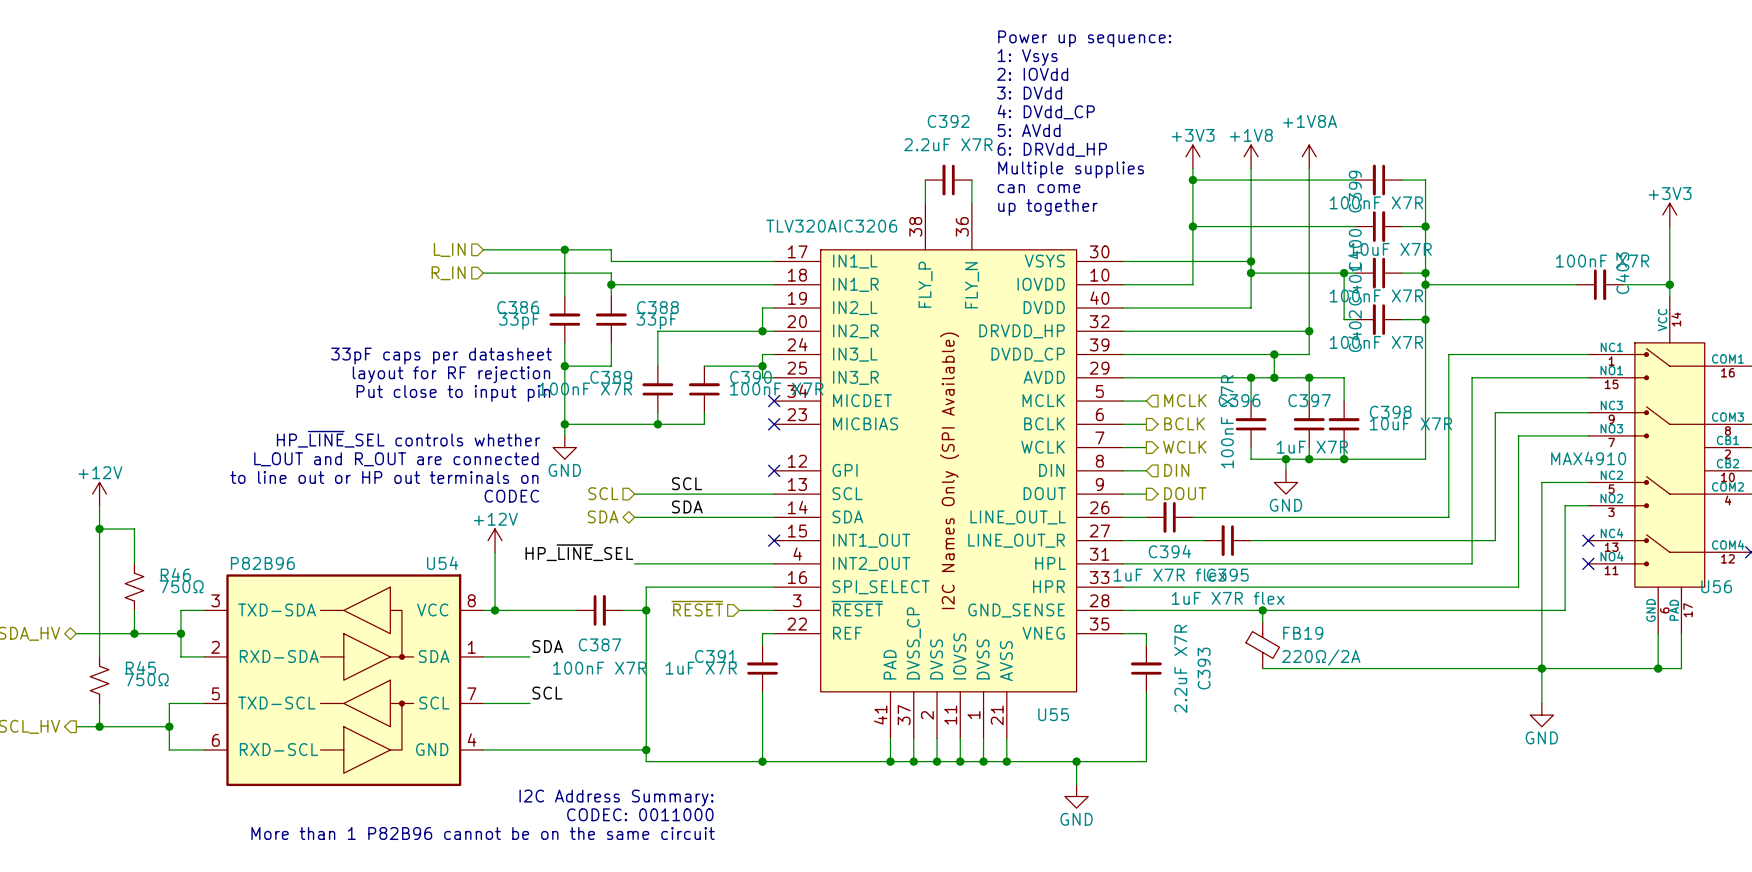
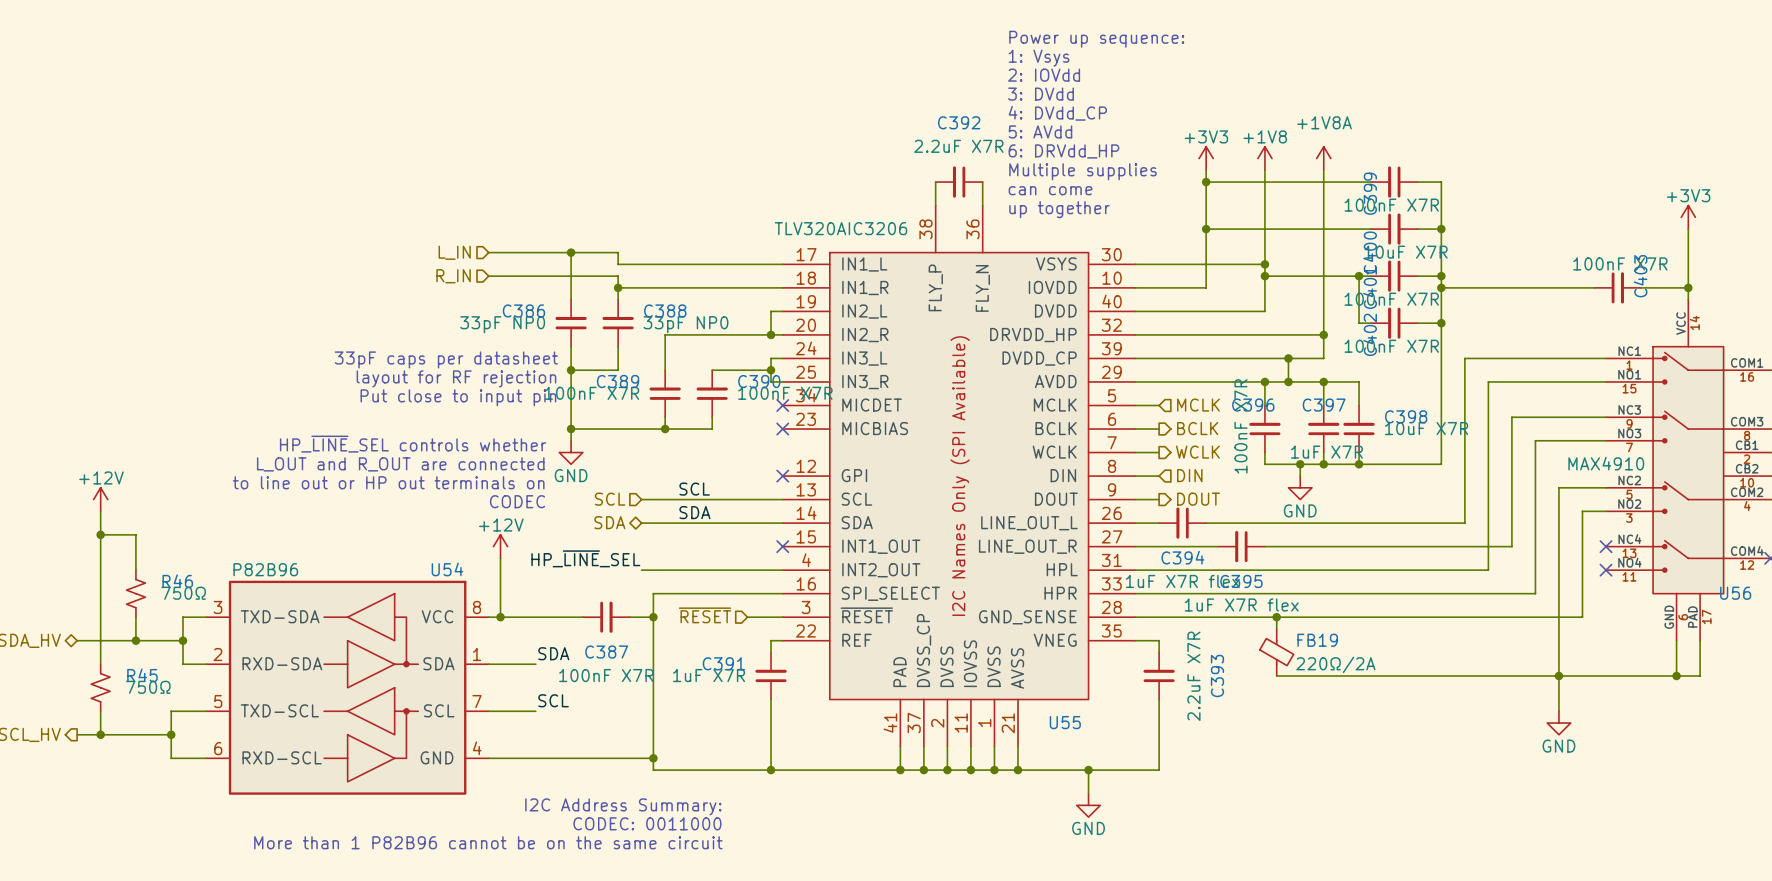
C386 value: 33pF (519, 321) -> 33pF NP0 (502, 324)
C388 value: 33pF (656, 321) -> 33pF NP0 (685, 324)

